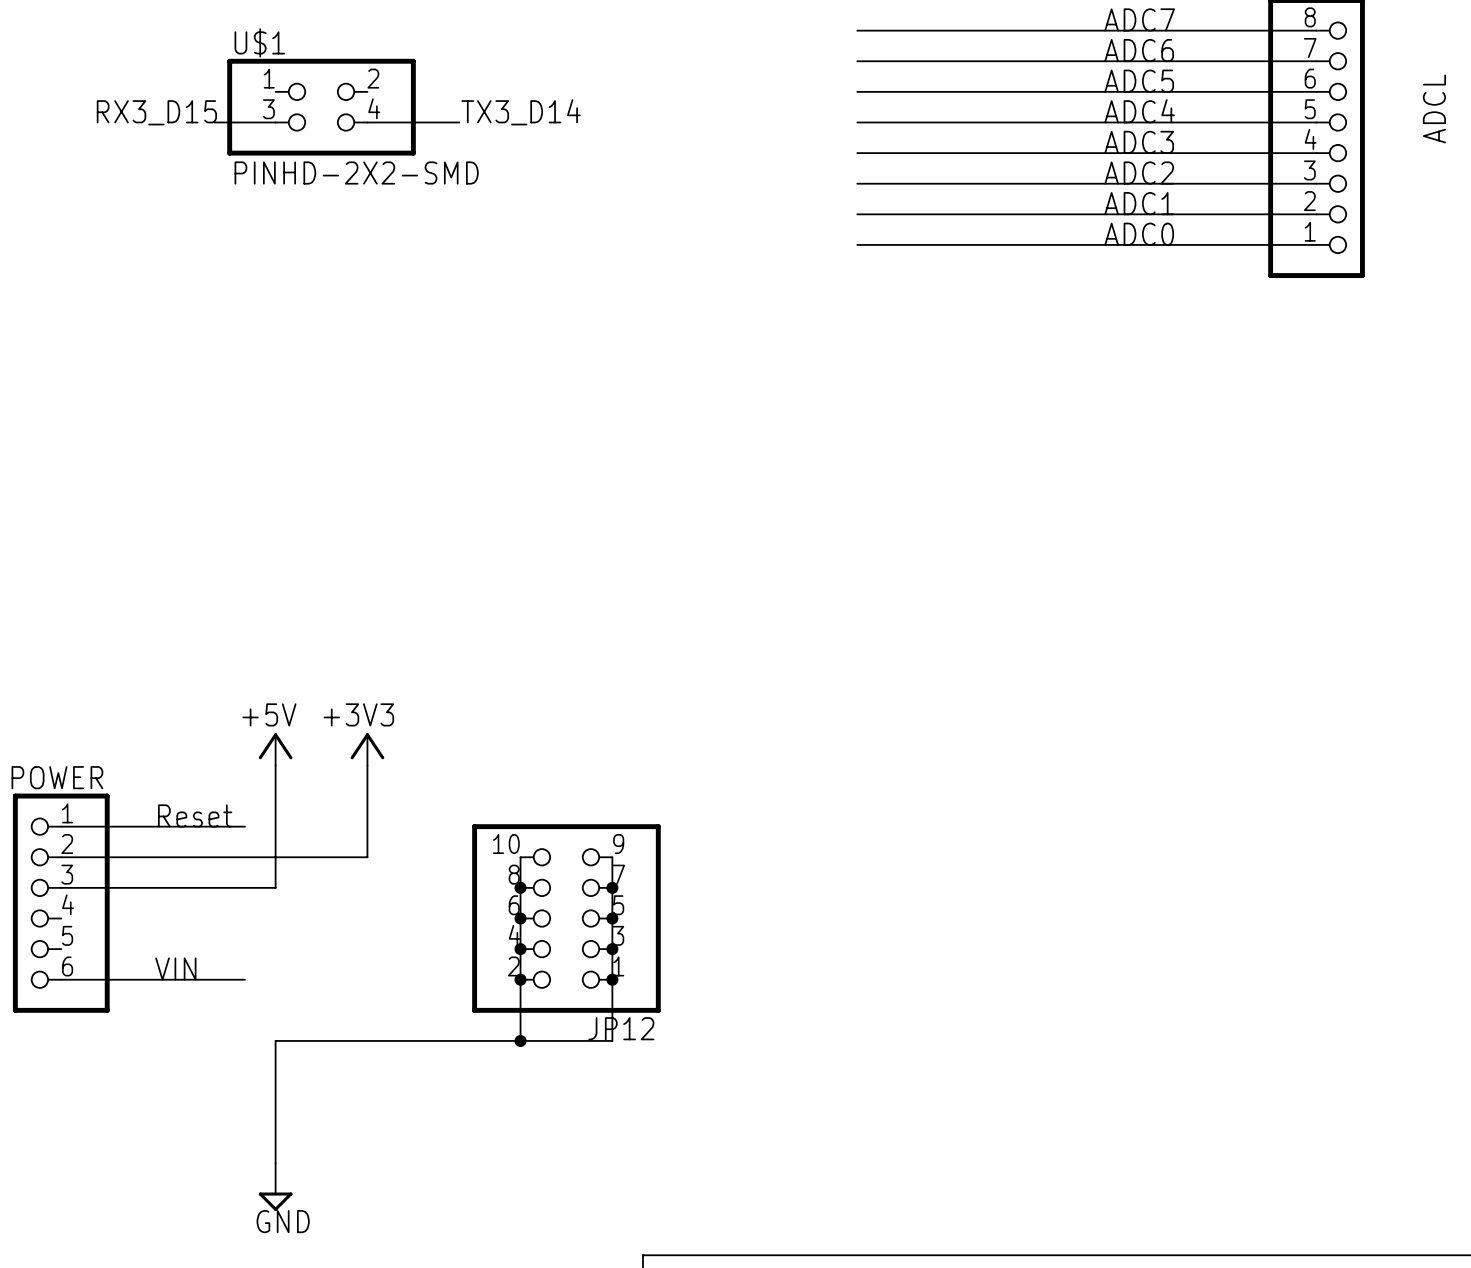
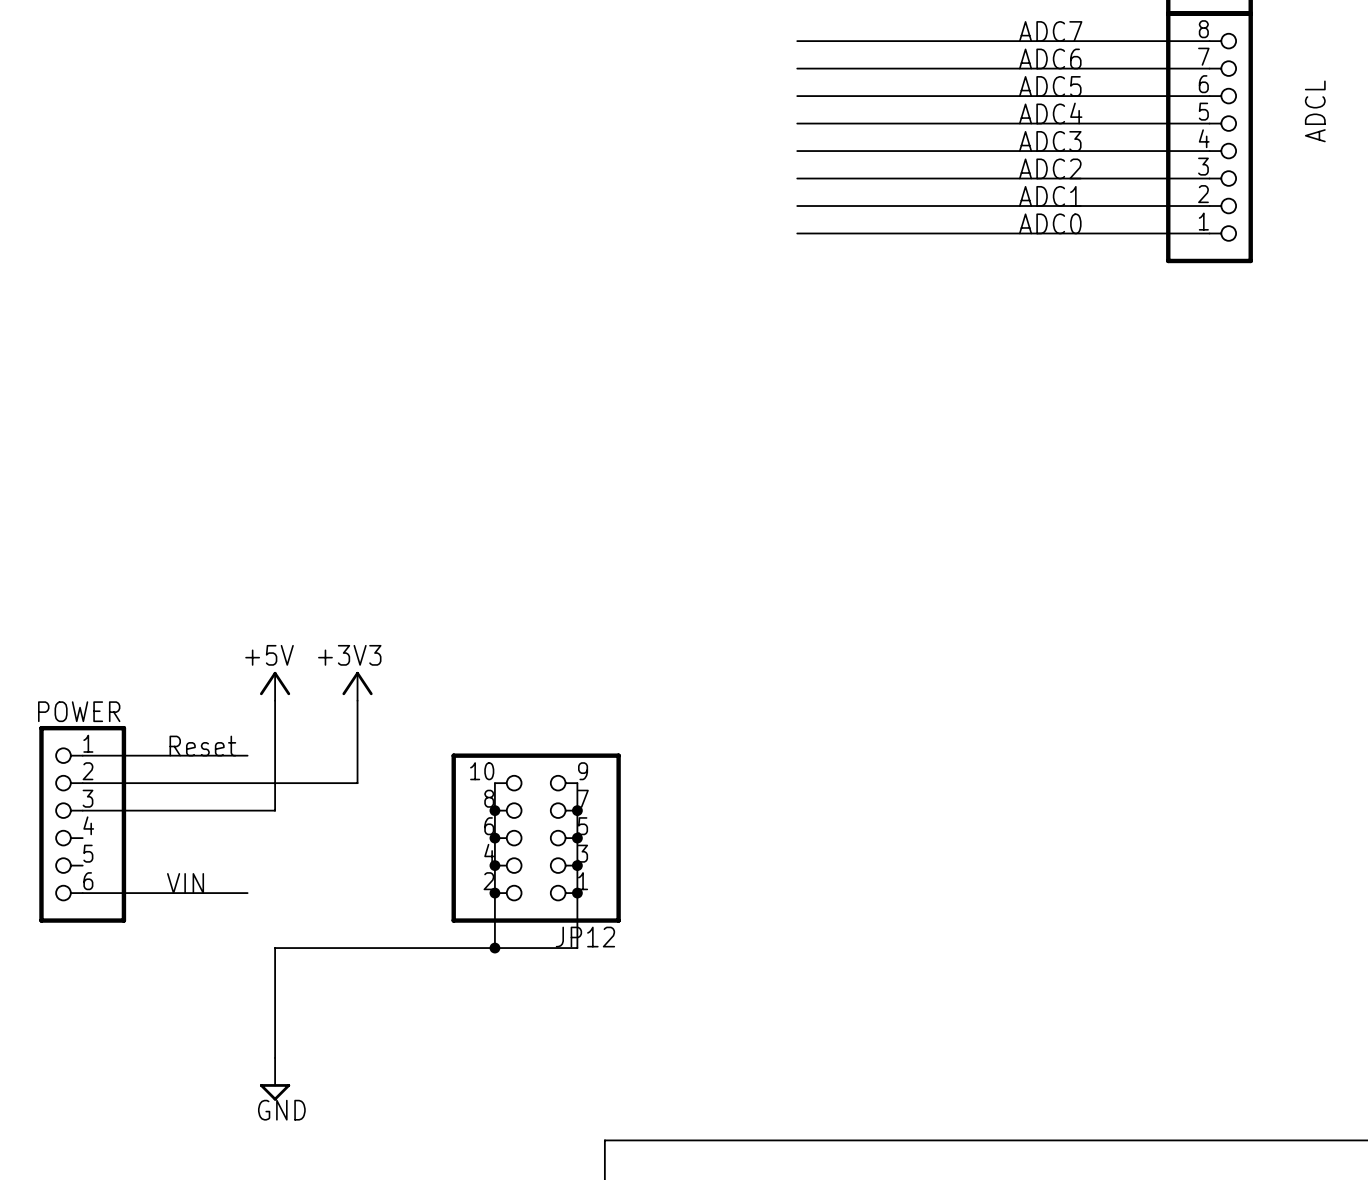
U$1: PINHD-2X2-SMD (321, 107) -> none
label: RX3_D15 (156, 112) -> none
label: TX3_D14 (521, 112) -> none
wire: (214, 122) (275, 122) -> none
wire: (367, 122) (459, 122) -> none

